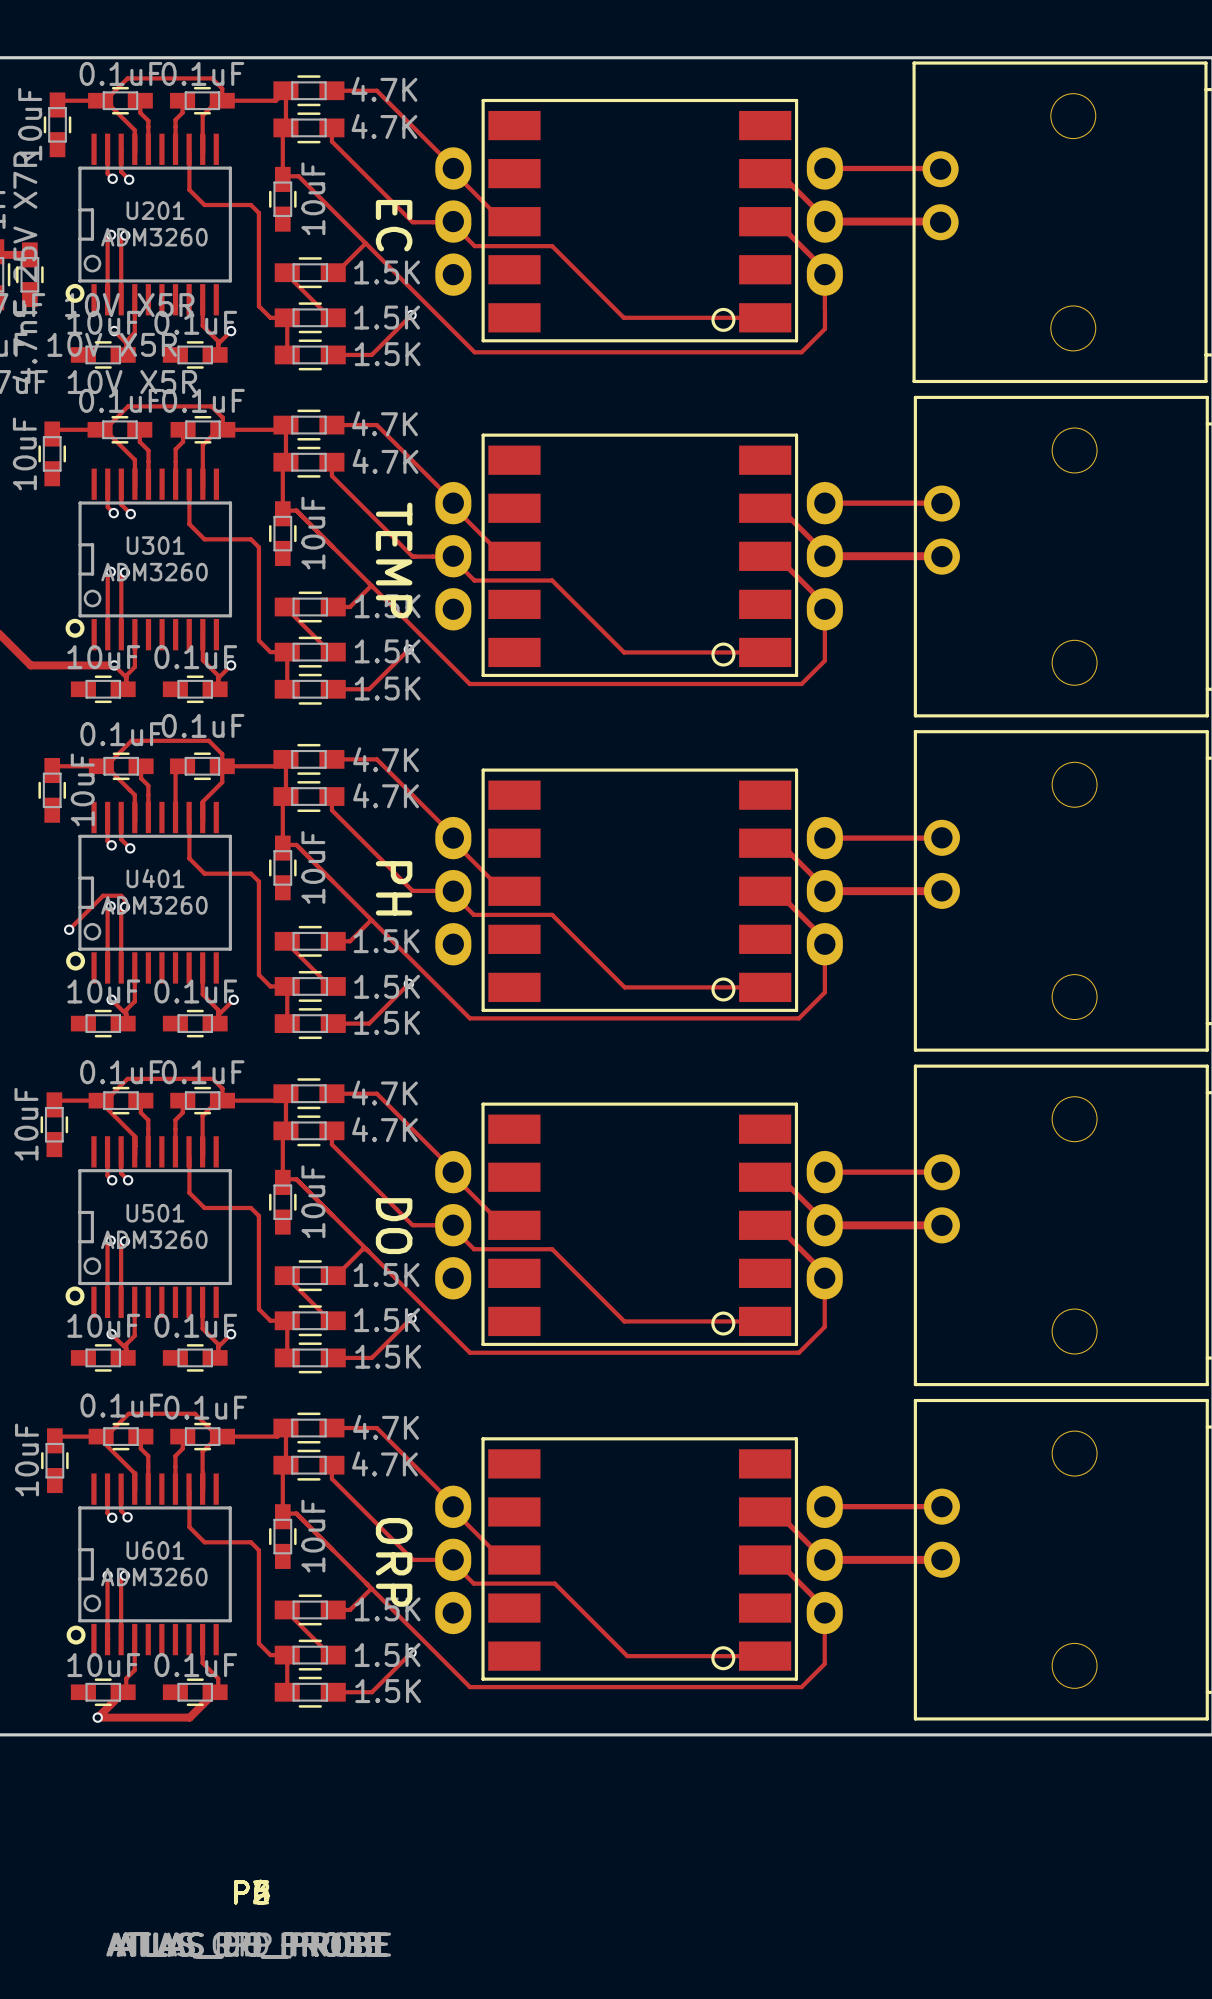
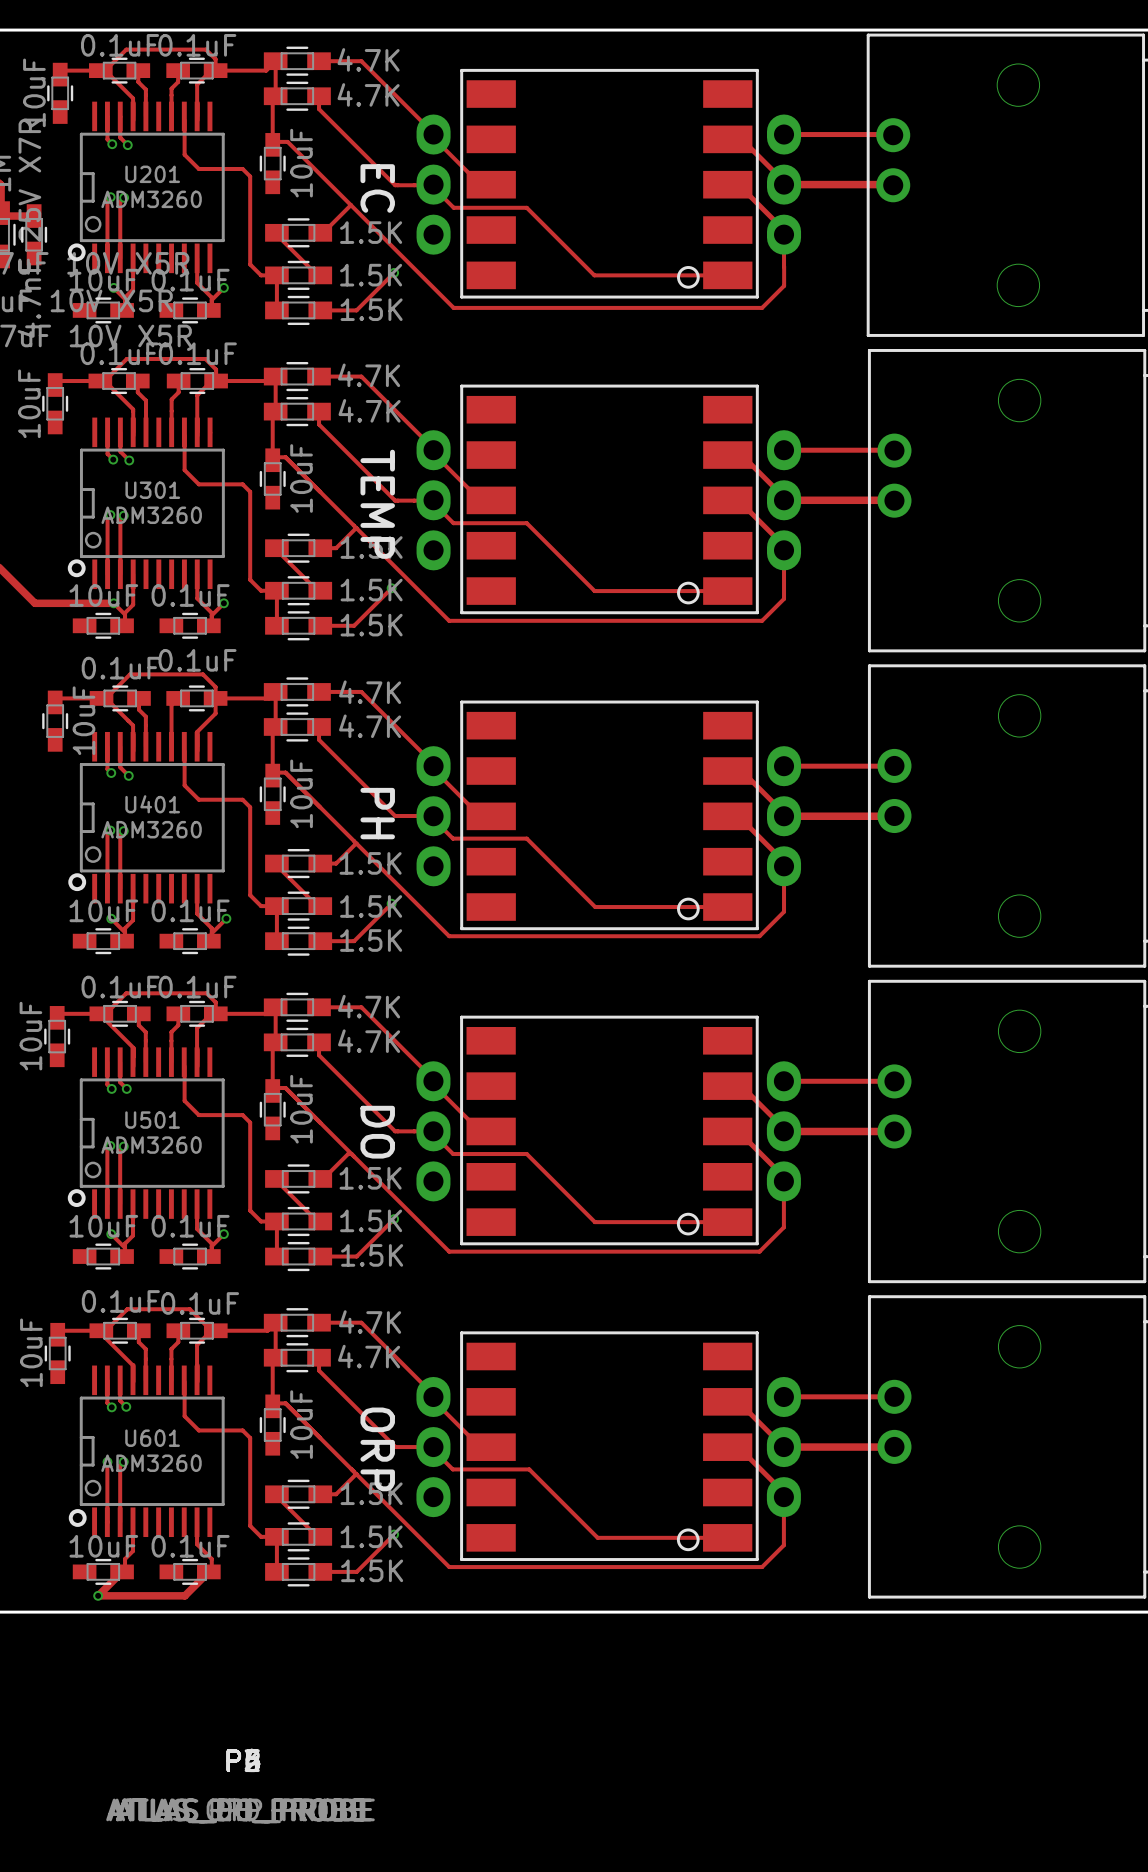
track: (124, 906) (124, 899) (121, 895) (103, 895) (69, 929) -> none
via: (69, 929) -> none

